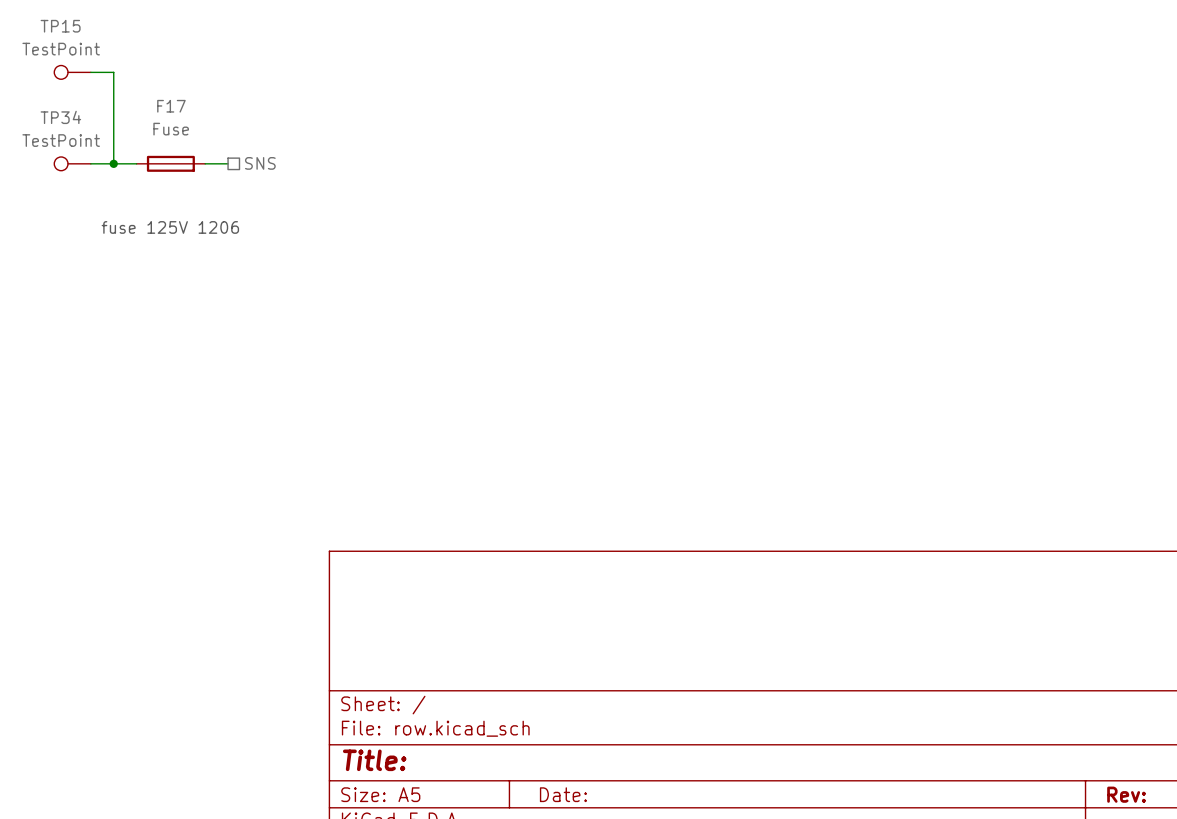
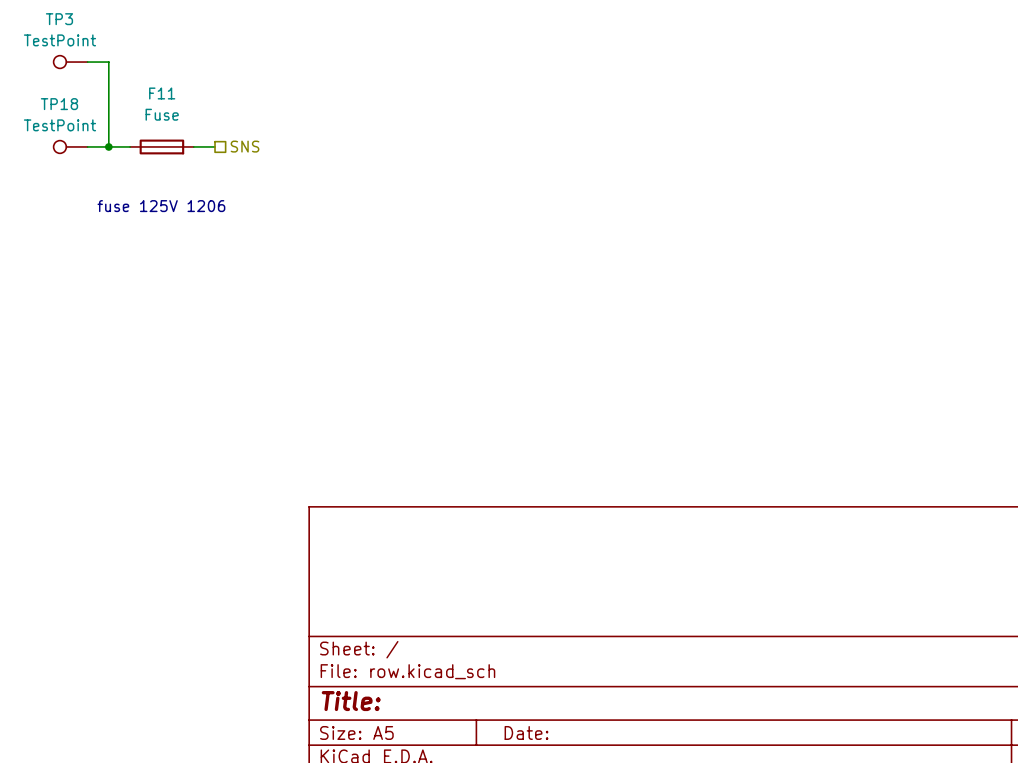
TP15 name: TP15 (60, 26) -> TP3 (59, 19)
F17 name: F17 (171, 106) -> F11 (162, 93)
TP34 name: TP34 (60, 117) -> TP18 (59, 104)

